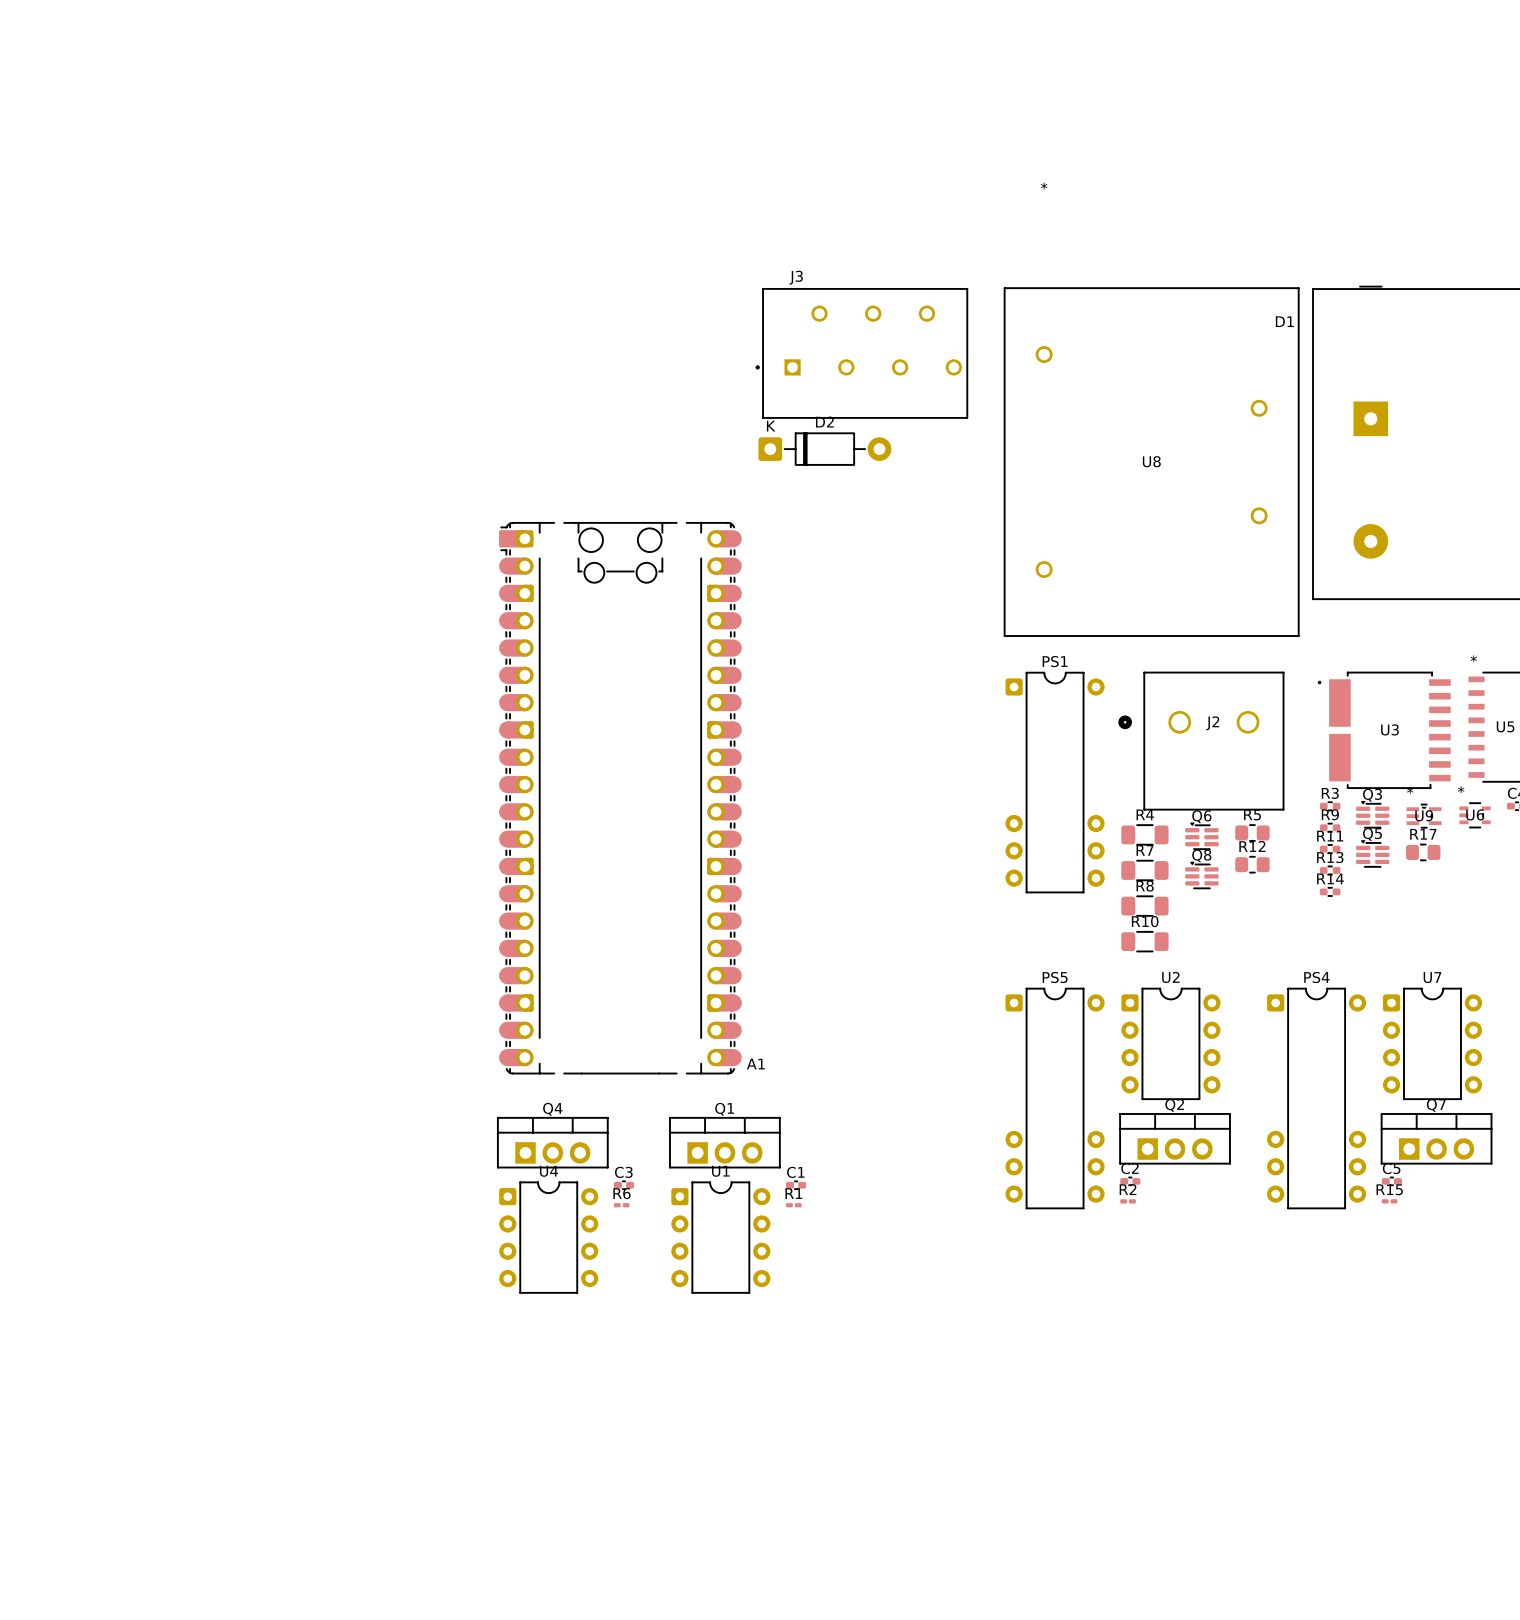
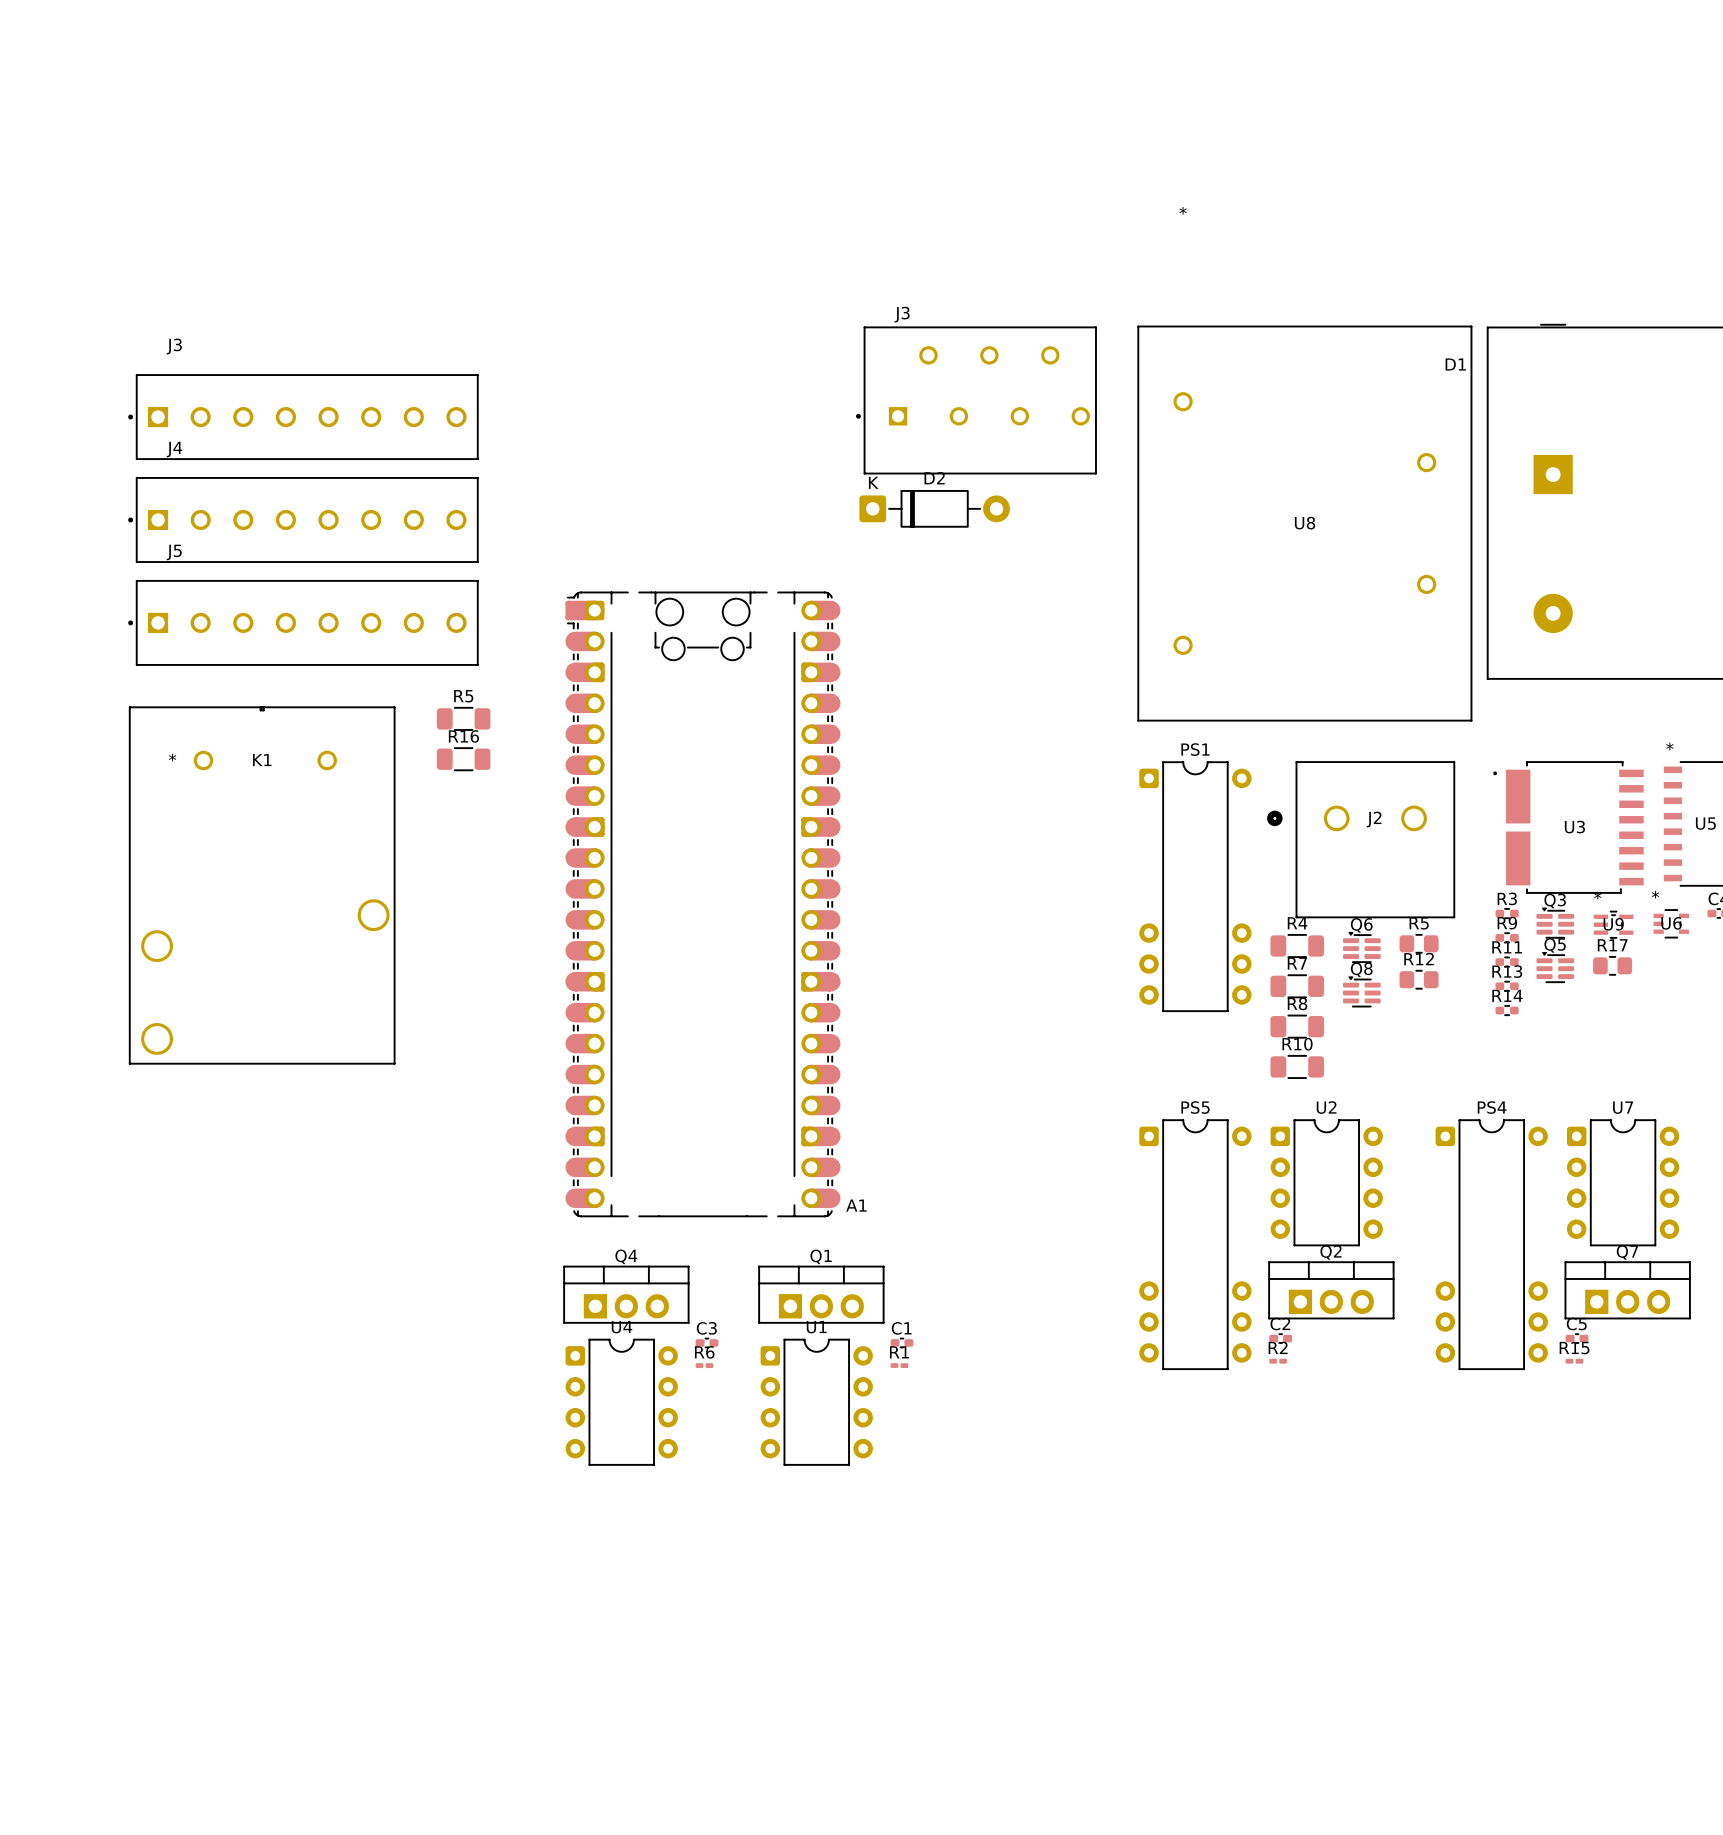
J3: none -> (303, 417)
J4: none -> (303, 519)
J5: none -> (303, 622)
R5: none -> (463, 718)
R16: none -> (463, 759)
K1: none -> (262, 885)

